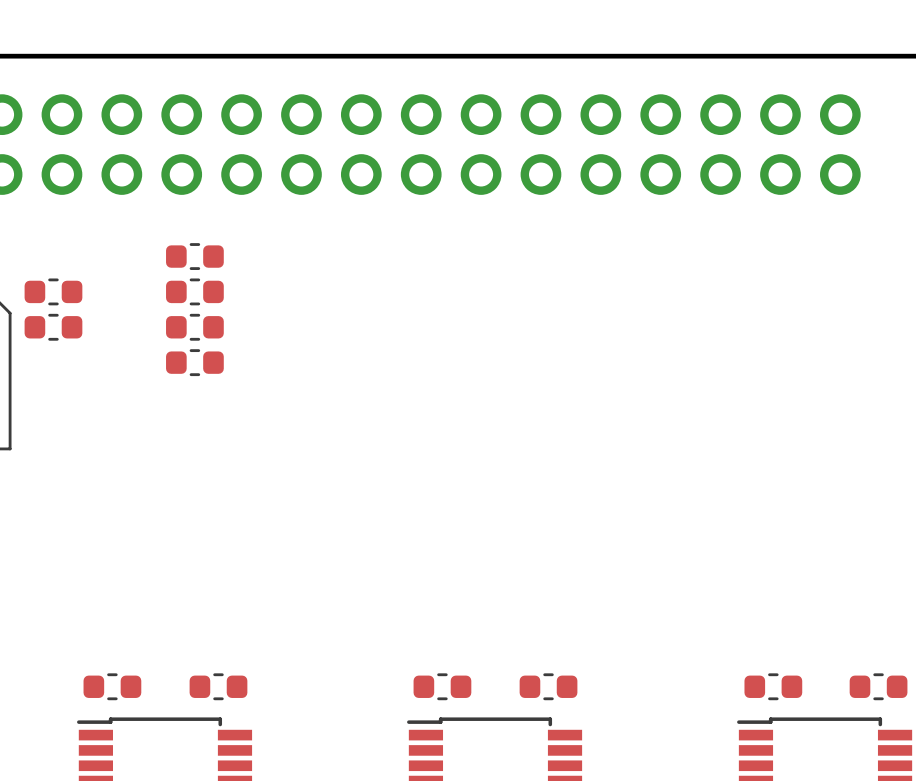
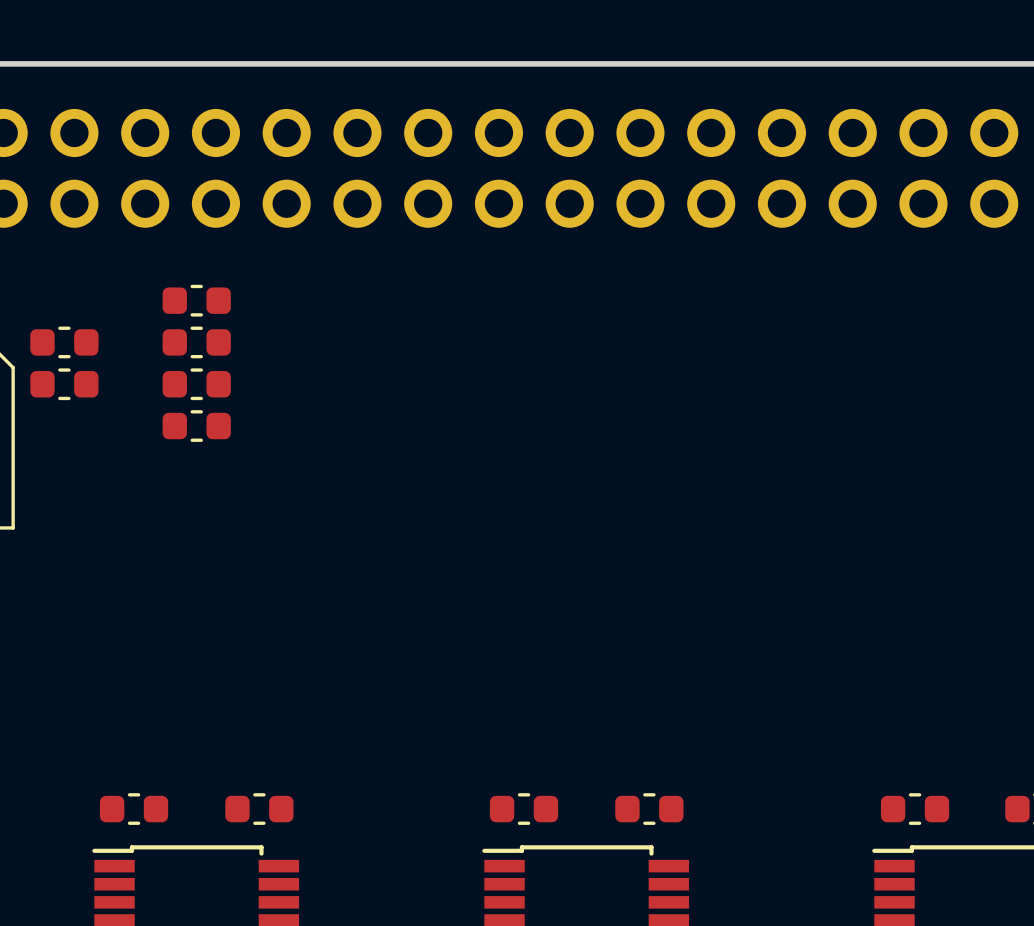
part: none -> (196, 300)
part: (194, 256) -> none
part: none -> (196, 342)
part: (194, 291) -> none
part: none -> (196, 384)
part: (194, 327) -> none
part: none -> (196, 426)
part: (194, 362) -> none

